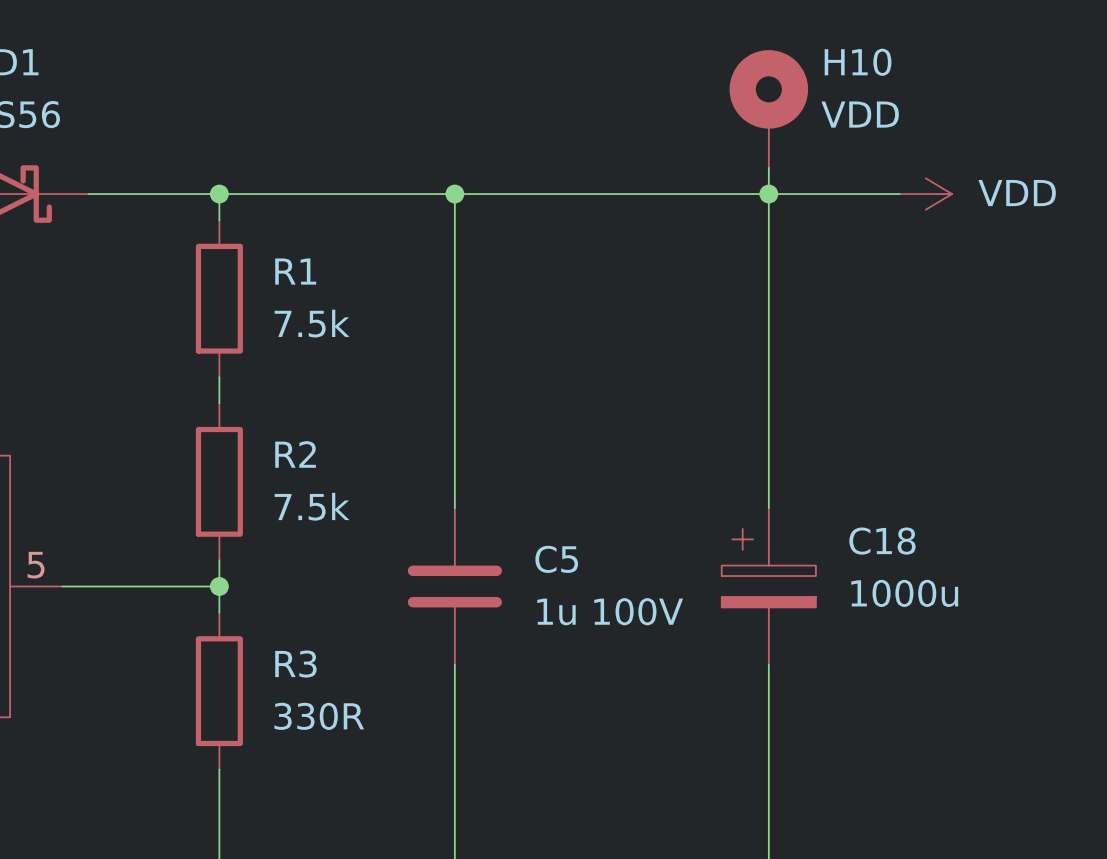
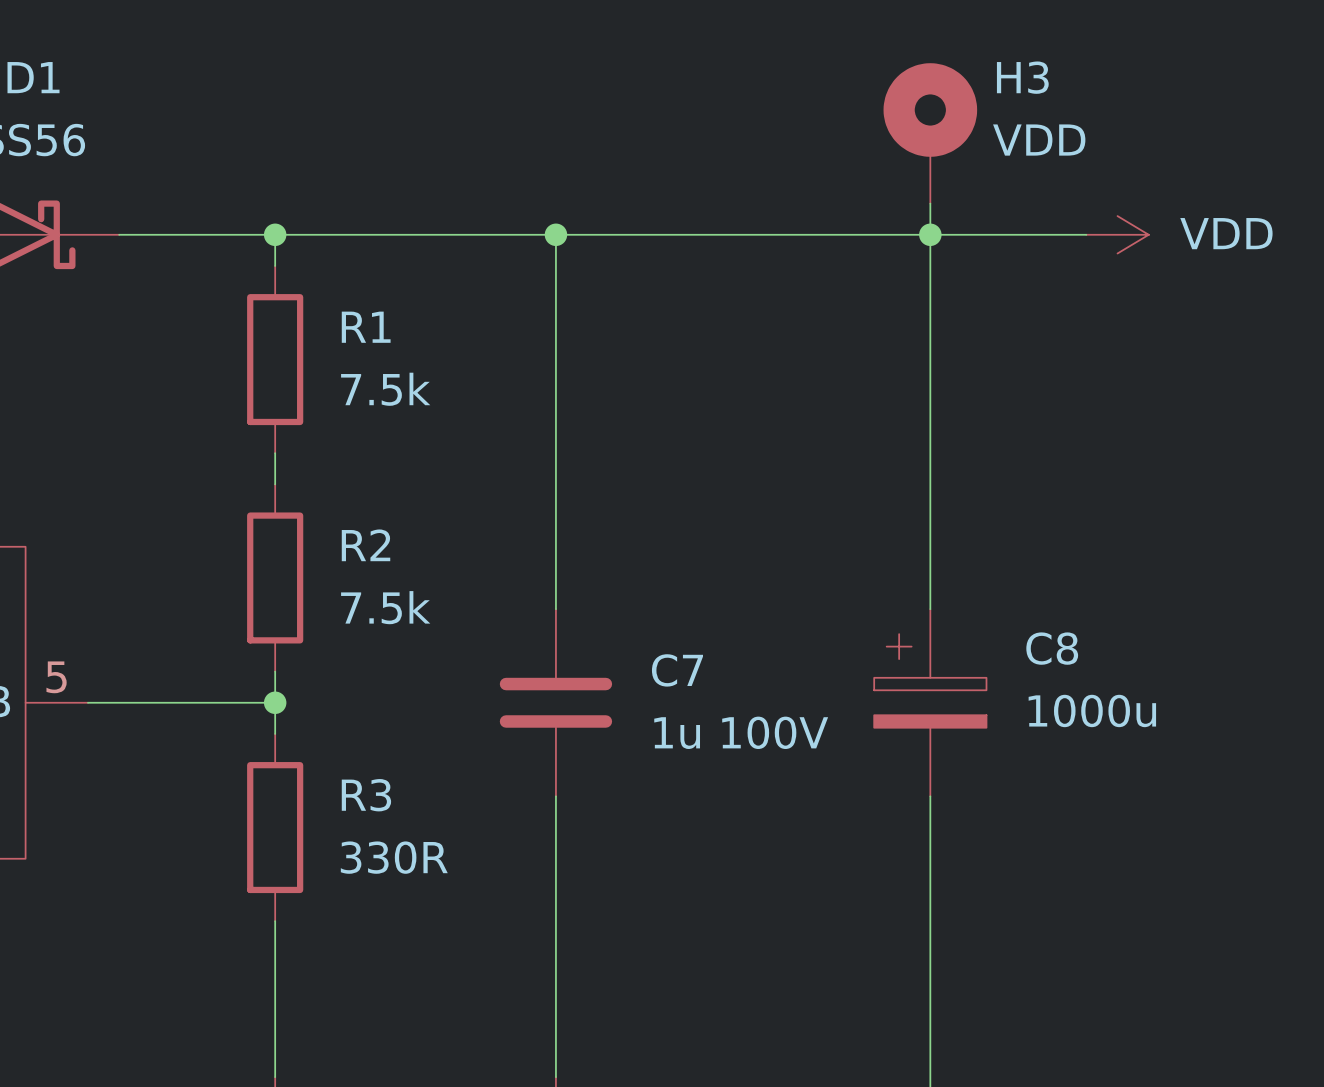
H10 name: H10 (858, 62) -> H3 (1022, 77)
C18 name: C18 (882, 541) -> C8 (1052, 648)
C5 name: C5 (556, 559) -> C7 (677, 670)

